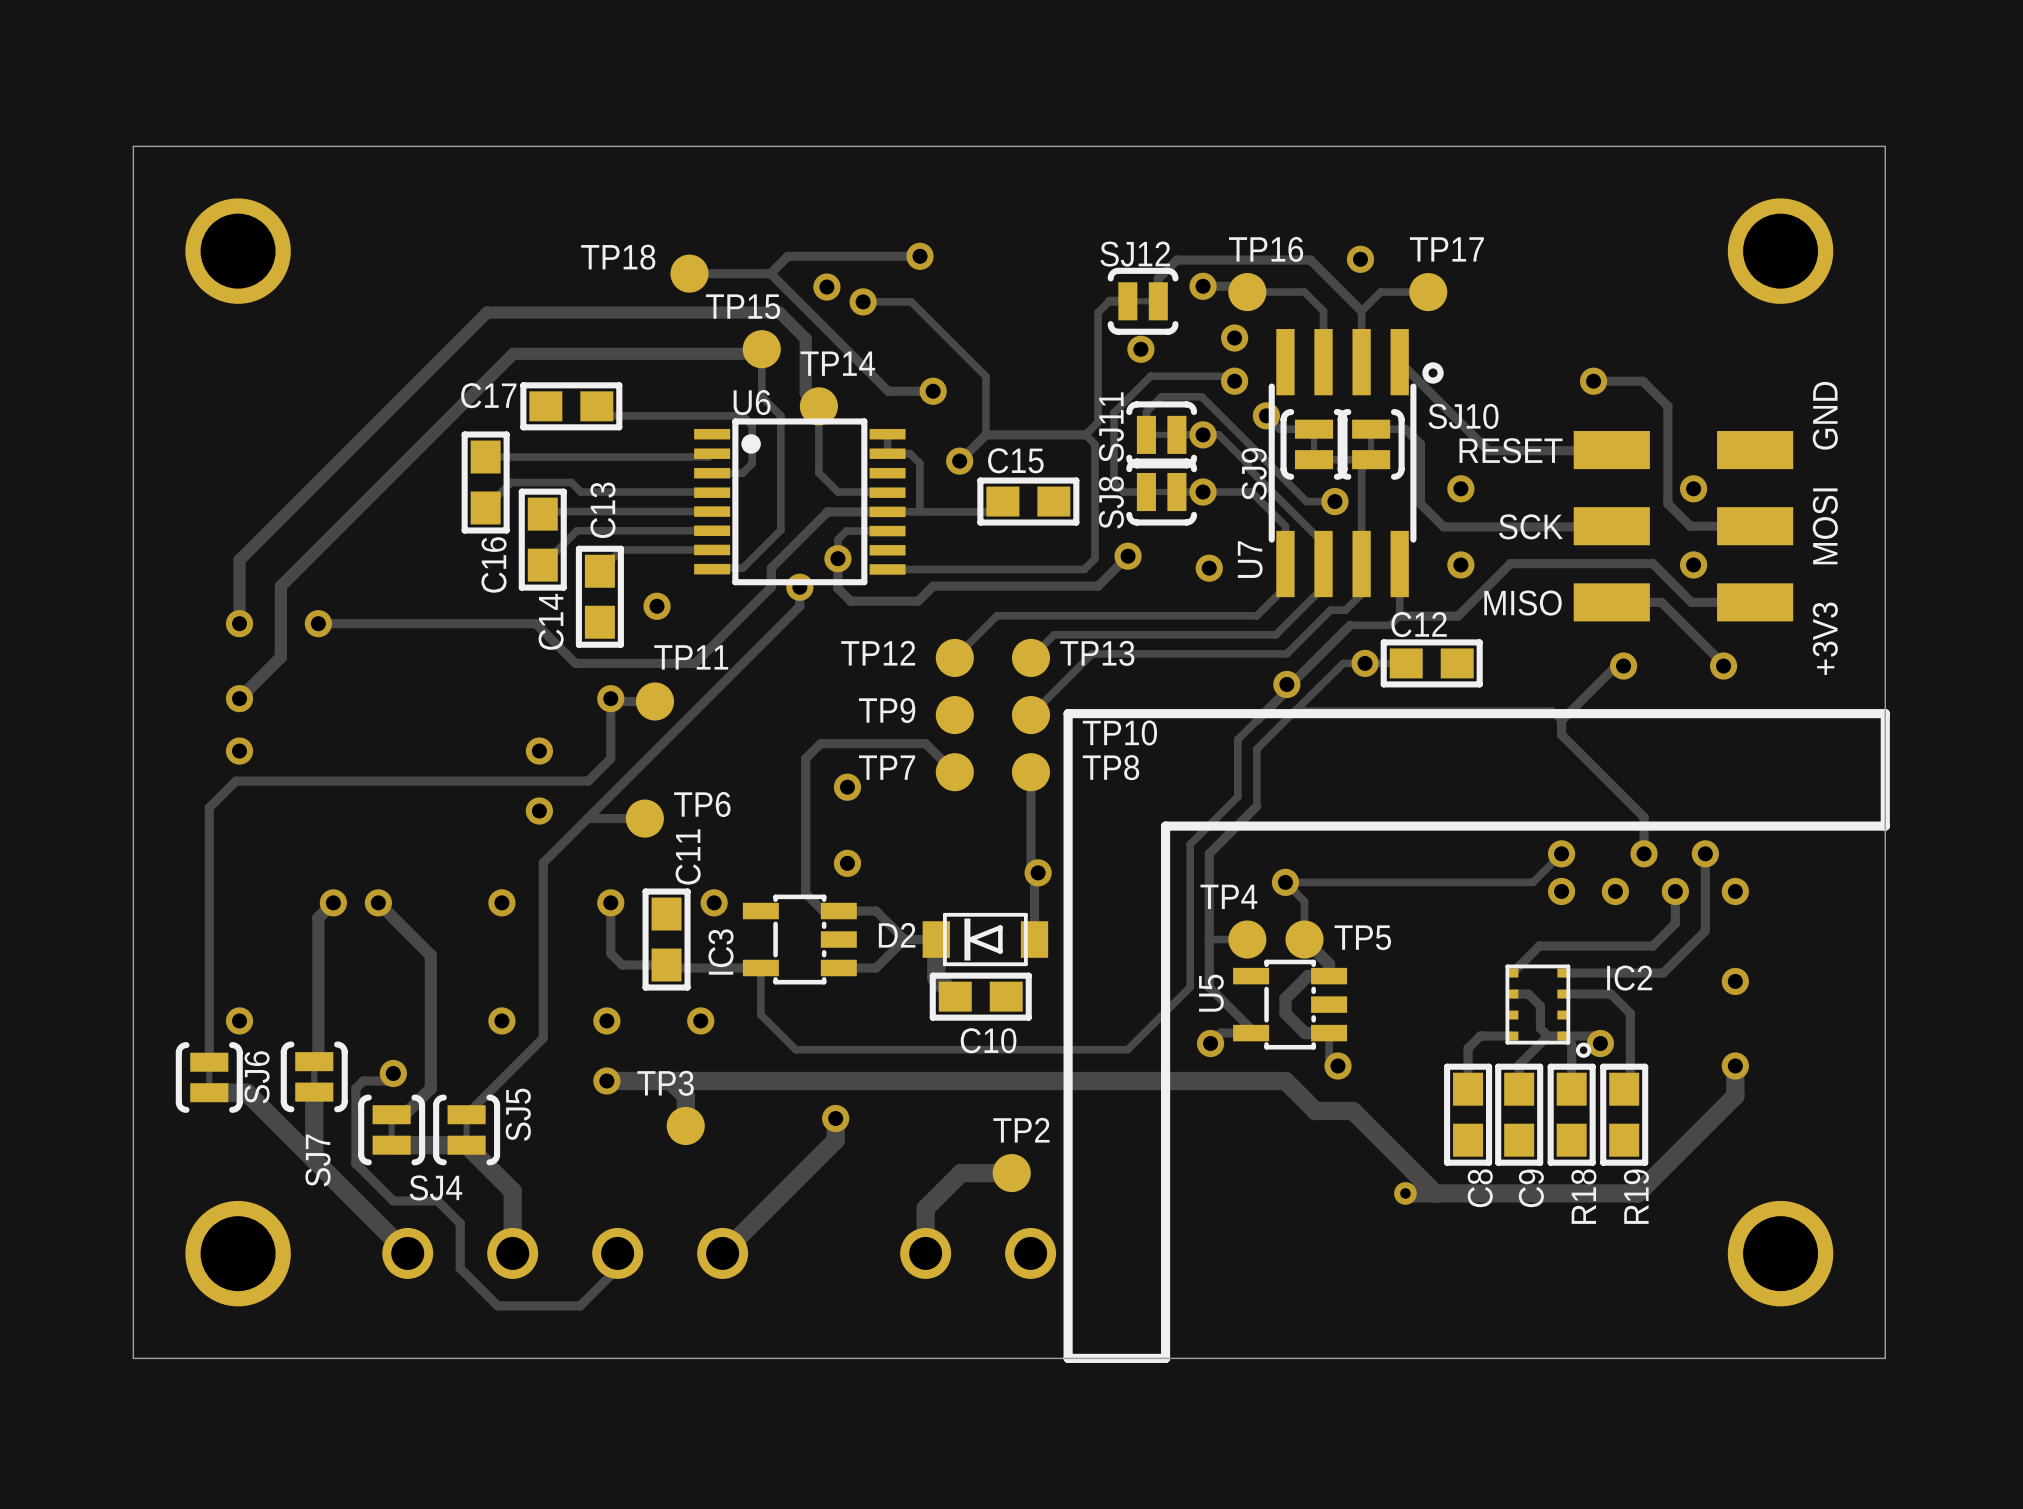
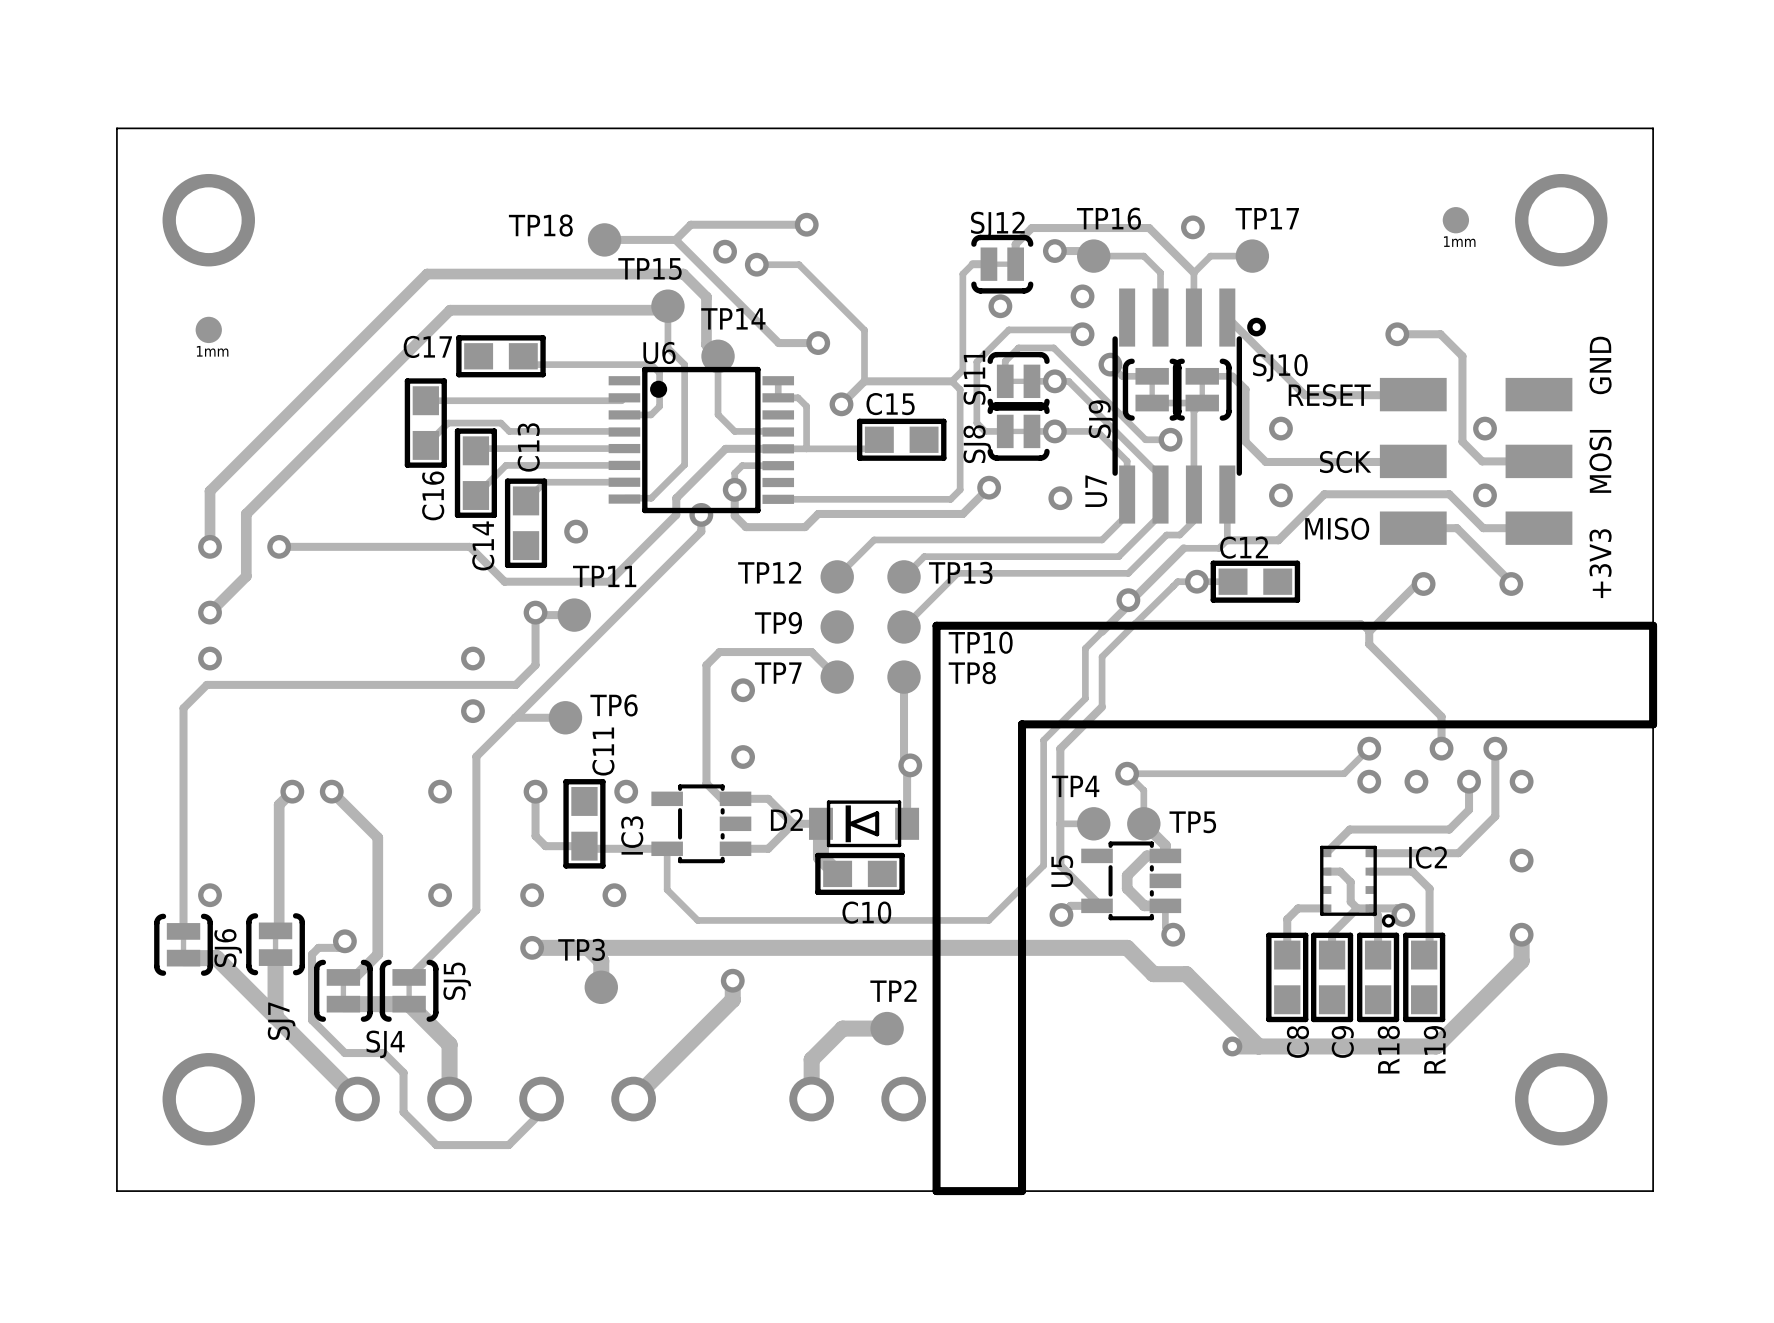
part: none -> (1455, 220)
part: none -> (208, 329)

